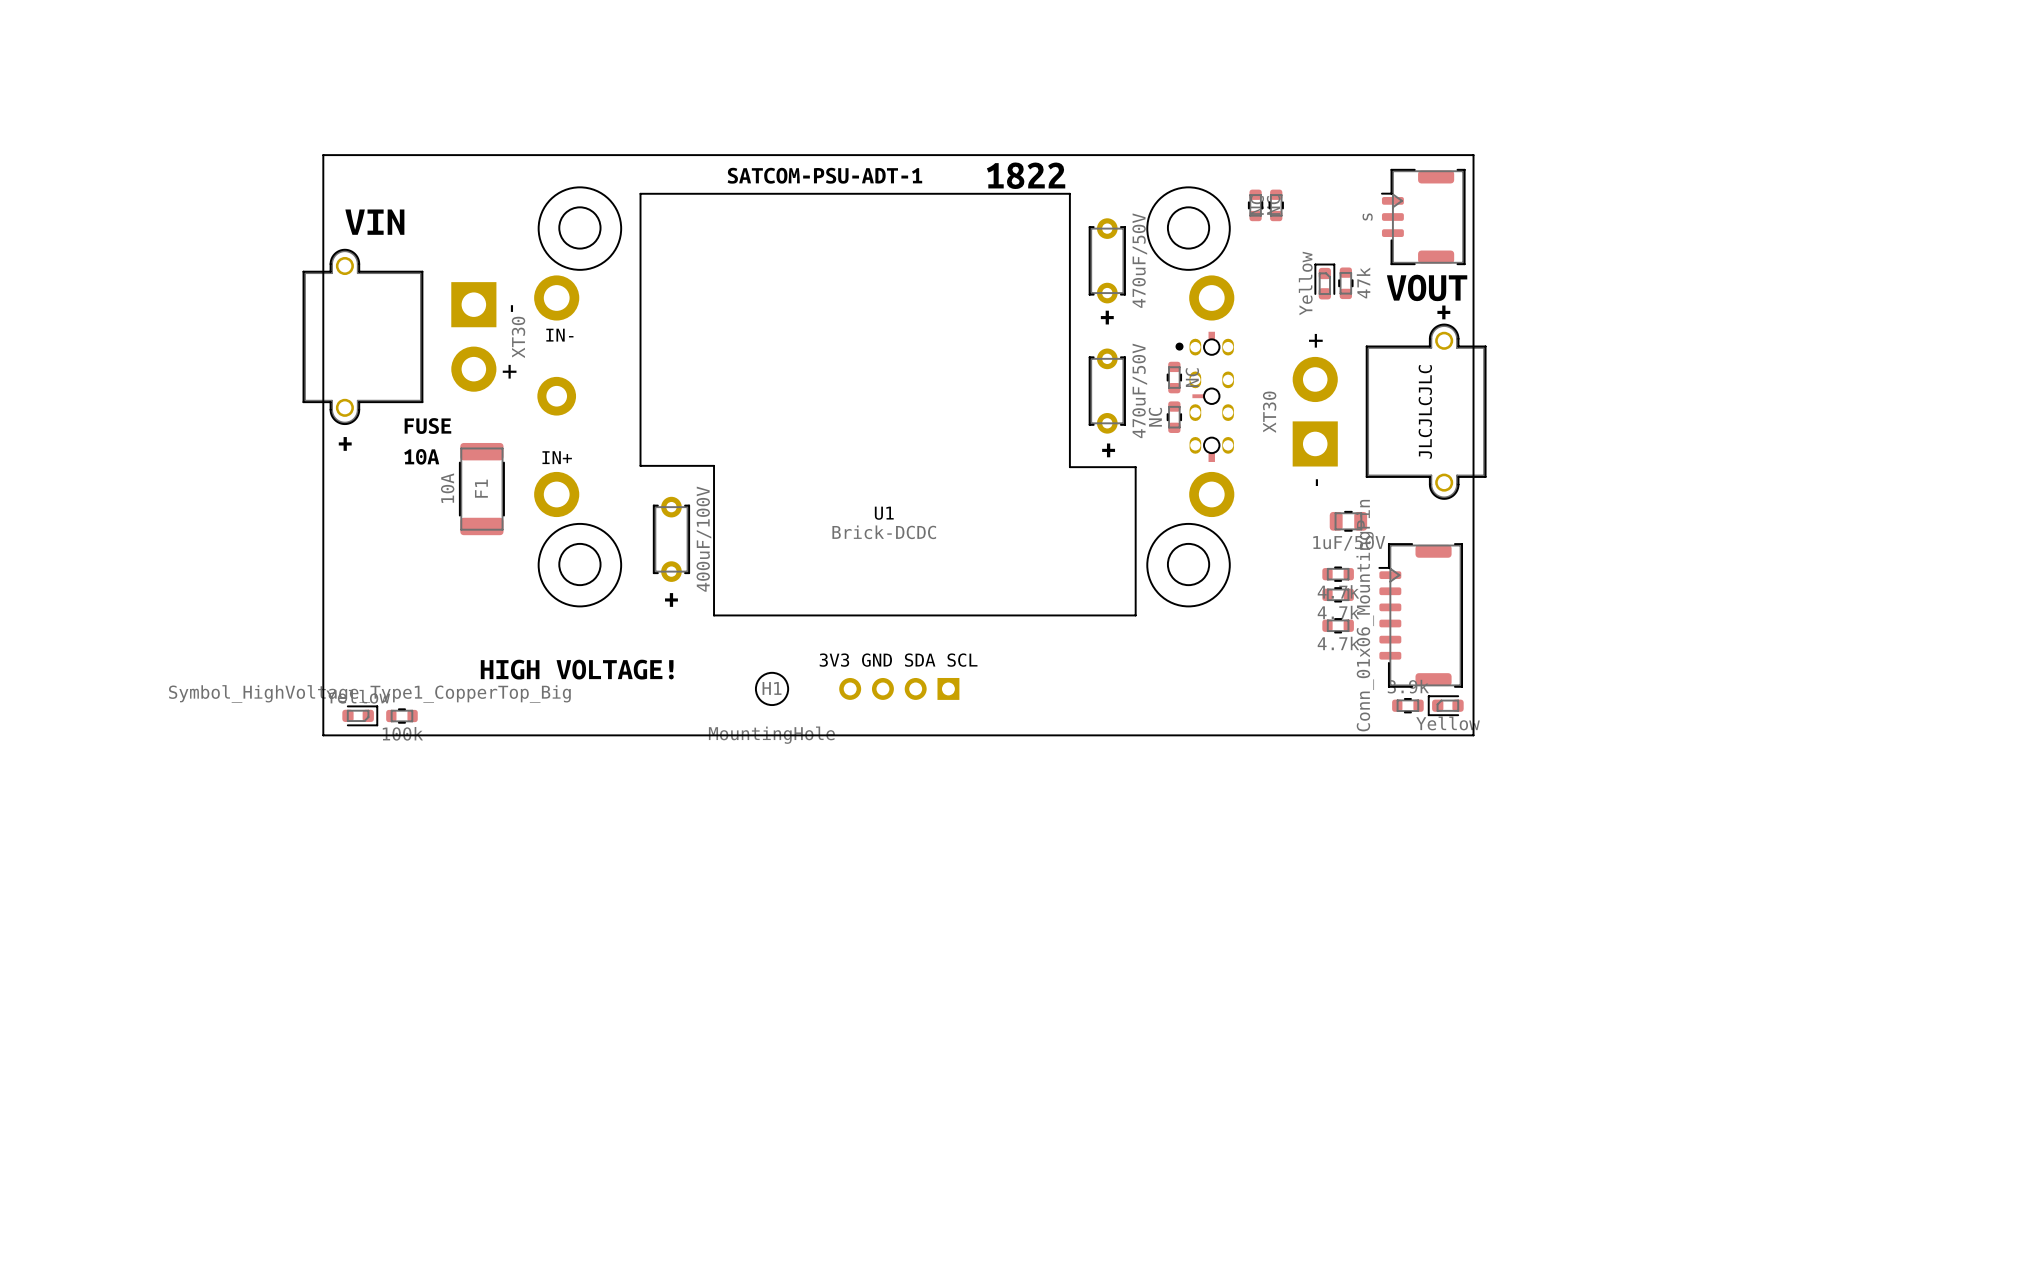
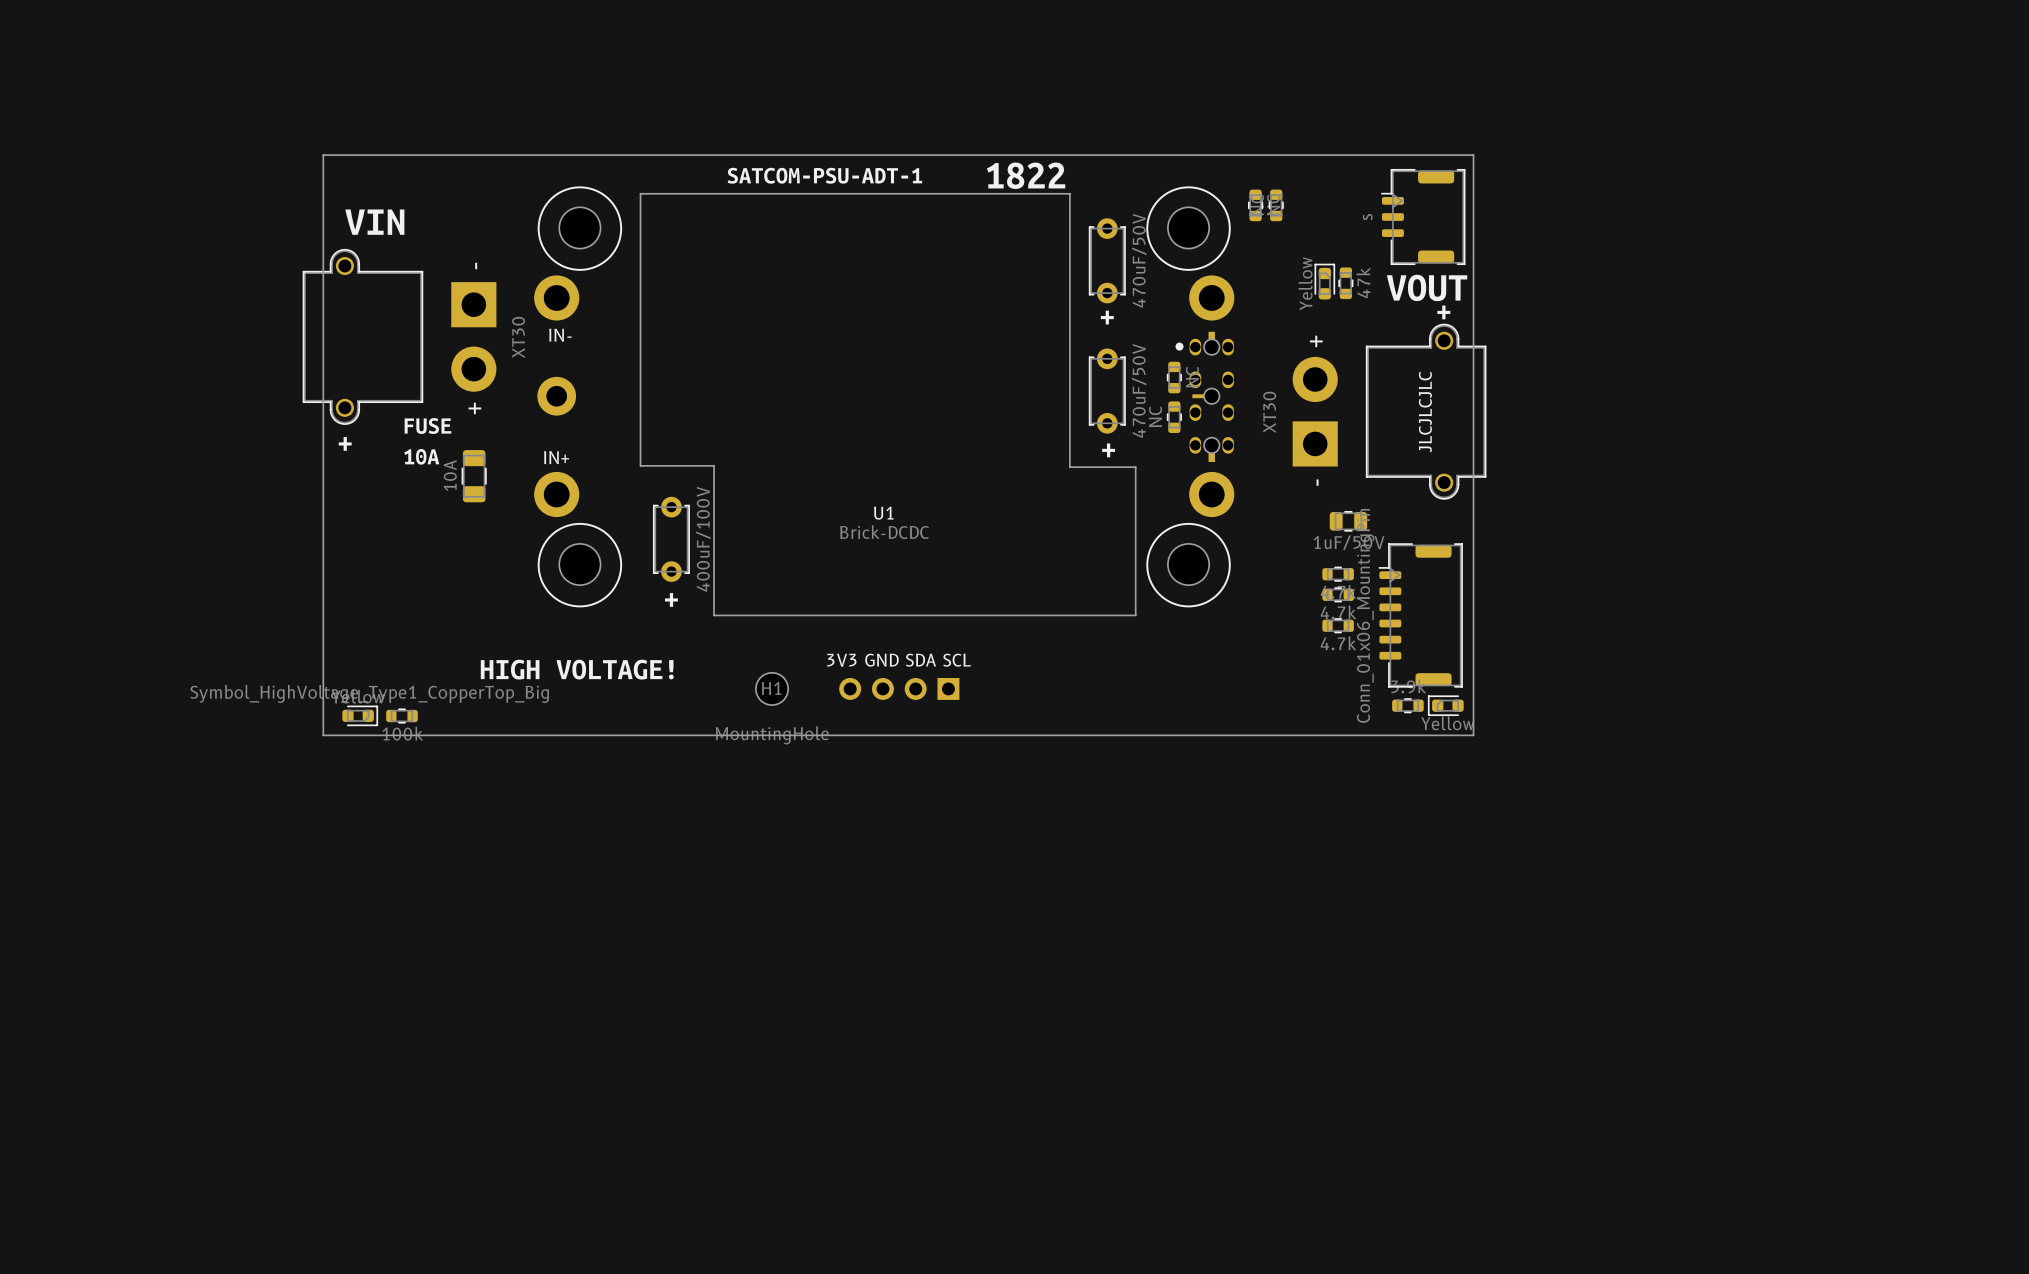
part text position: - (511, 308) -> - (476, 266)
part text position: + (509, 371) -> + (474, 408)
part: none -> 10A (474, 476)
F1: 10A (481, 489) -> none

